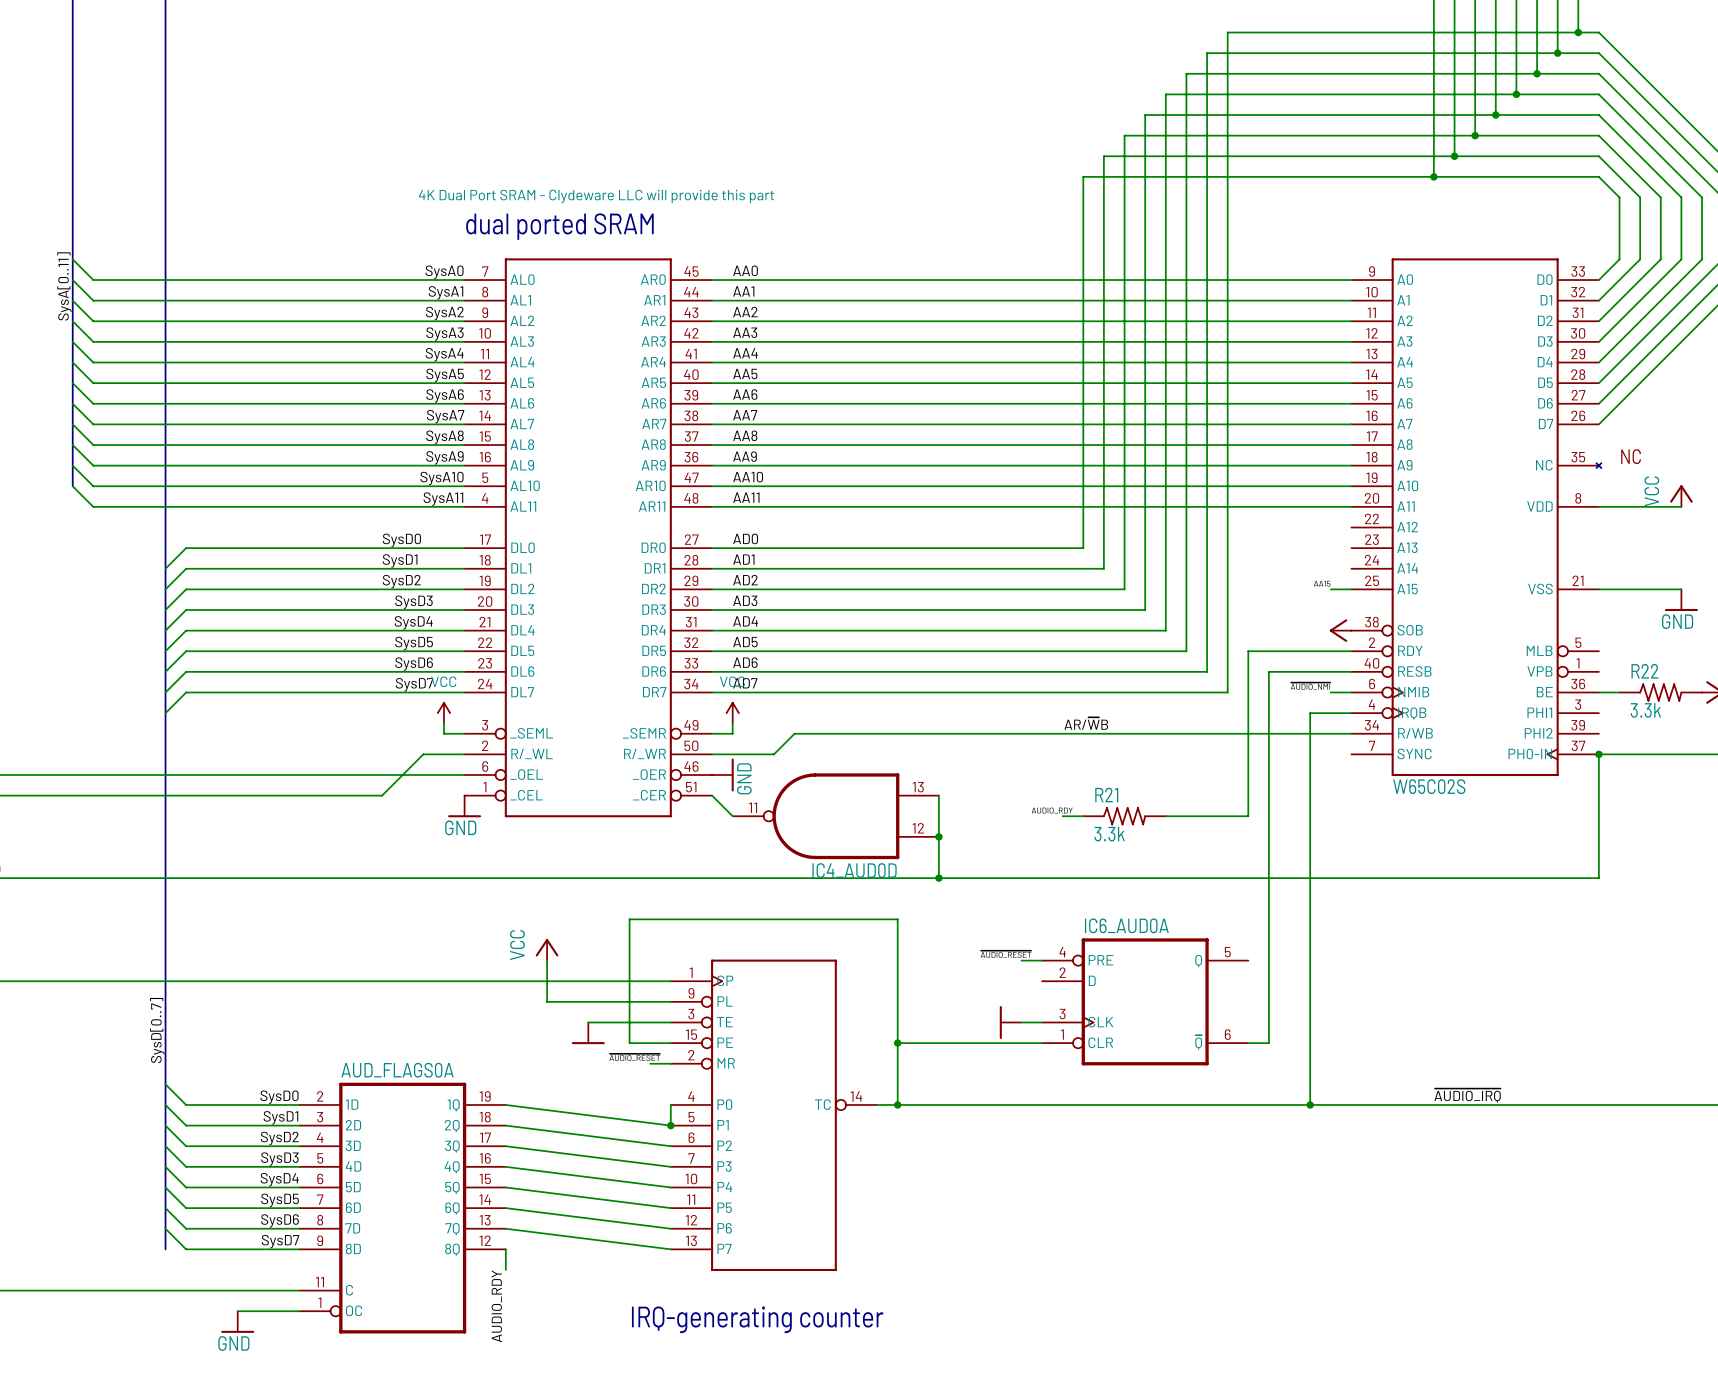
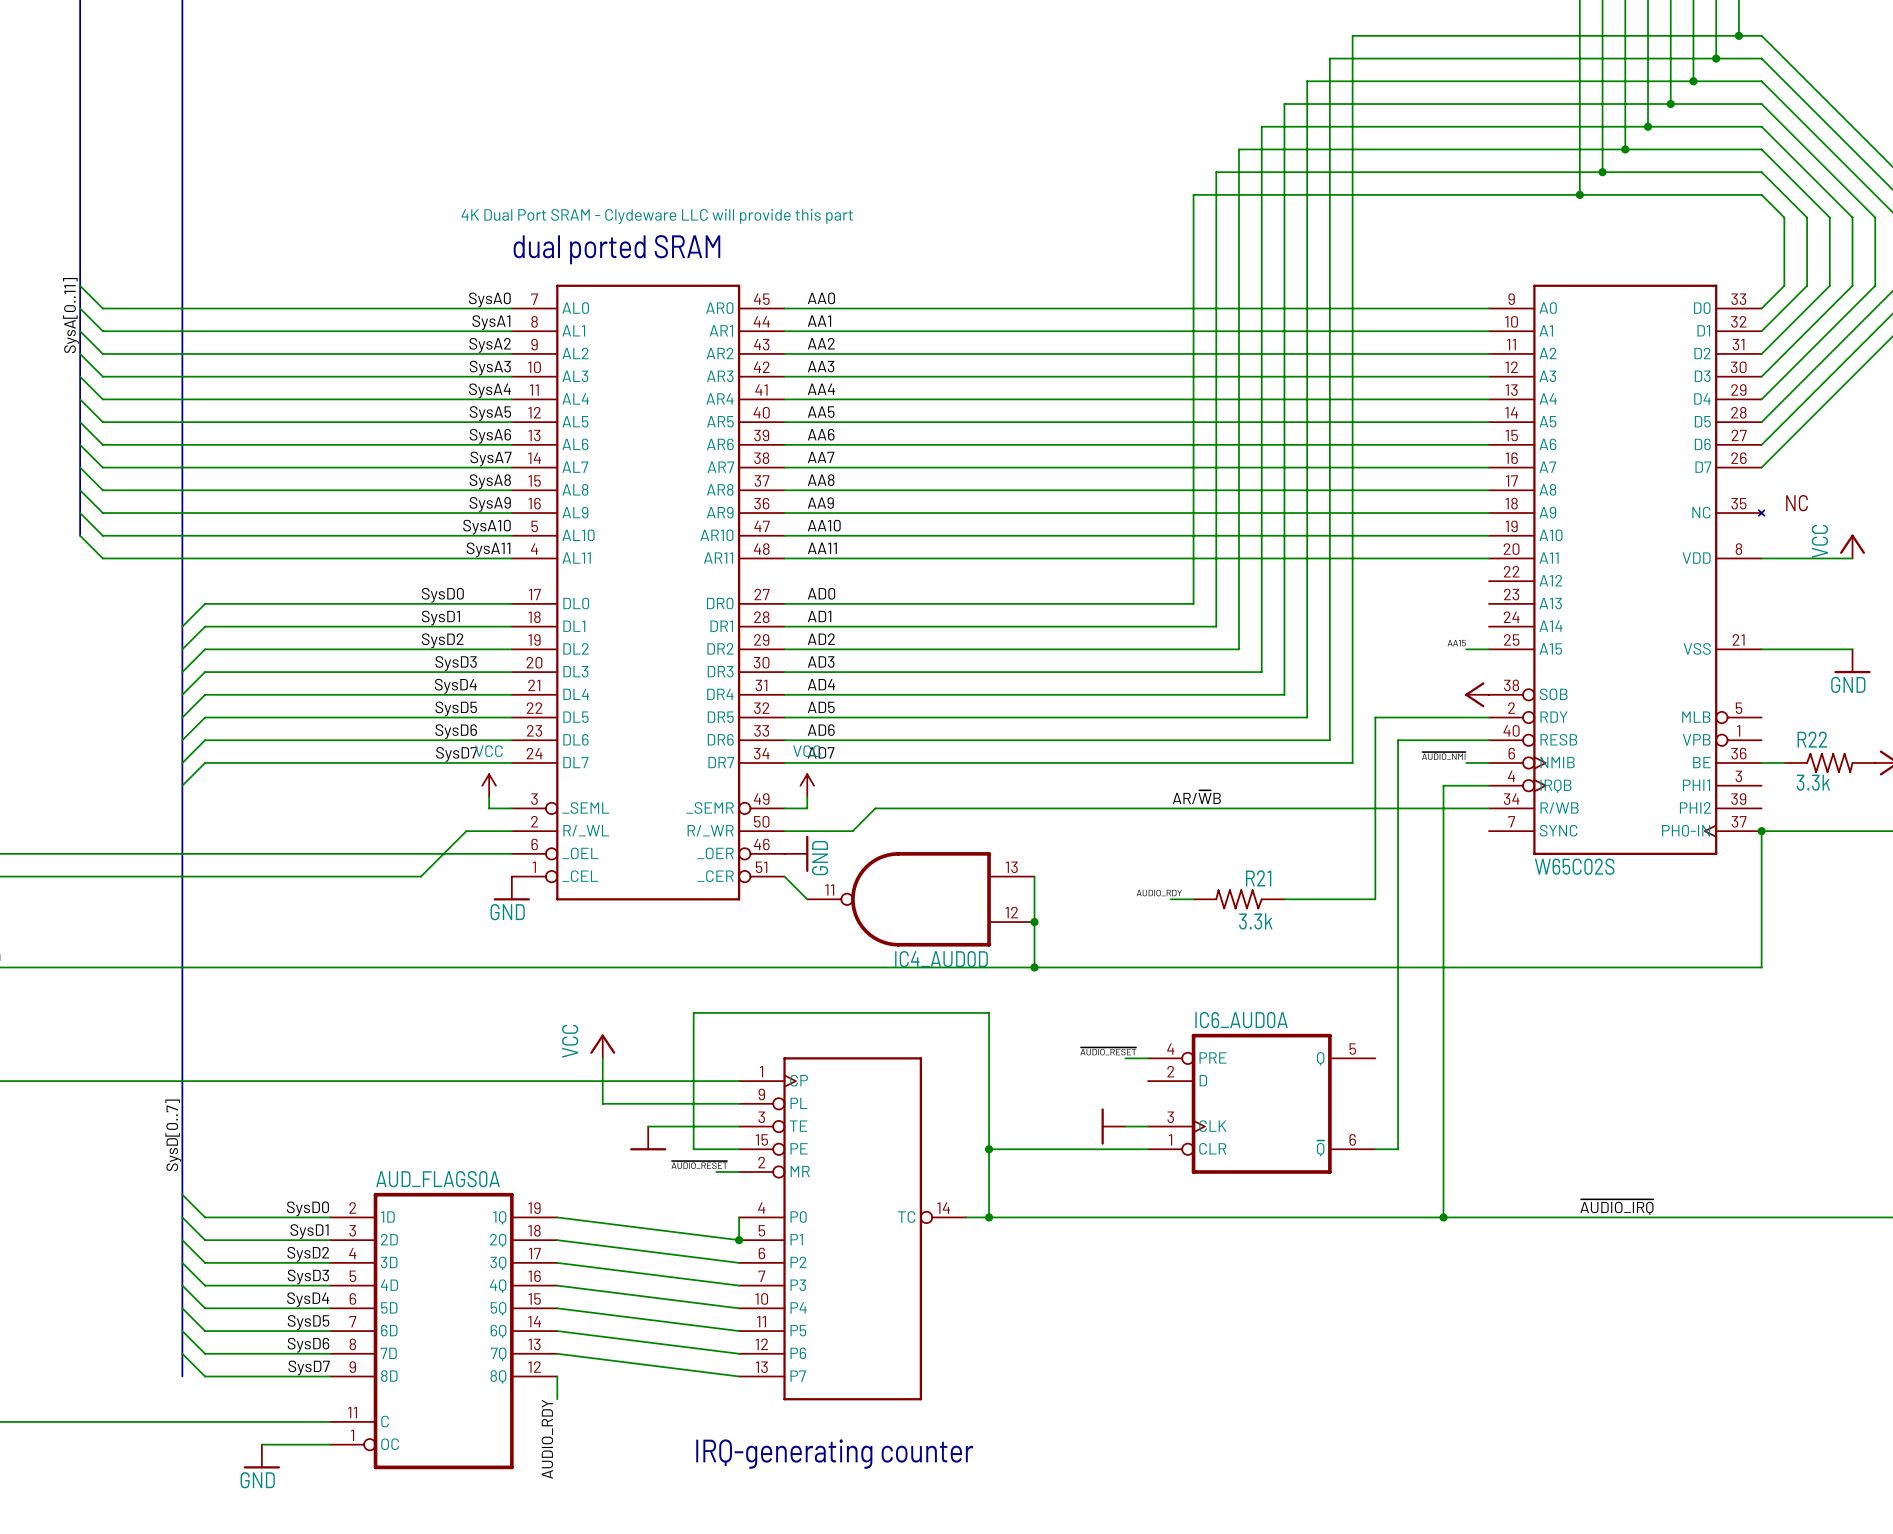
R21 name position: R21 (1106, 795) -> R21 (1258, 878)
R21 rotation: 0° (1124, 816) -> 180° (1239, 899)

